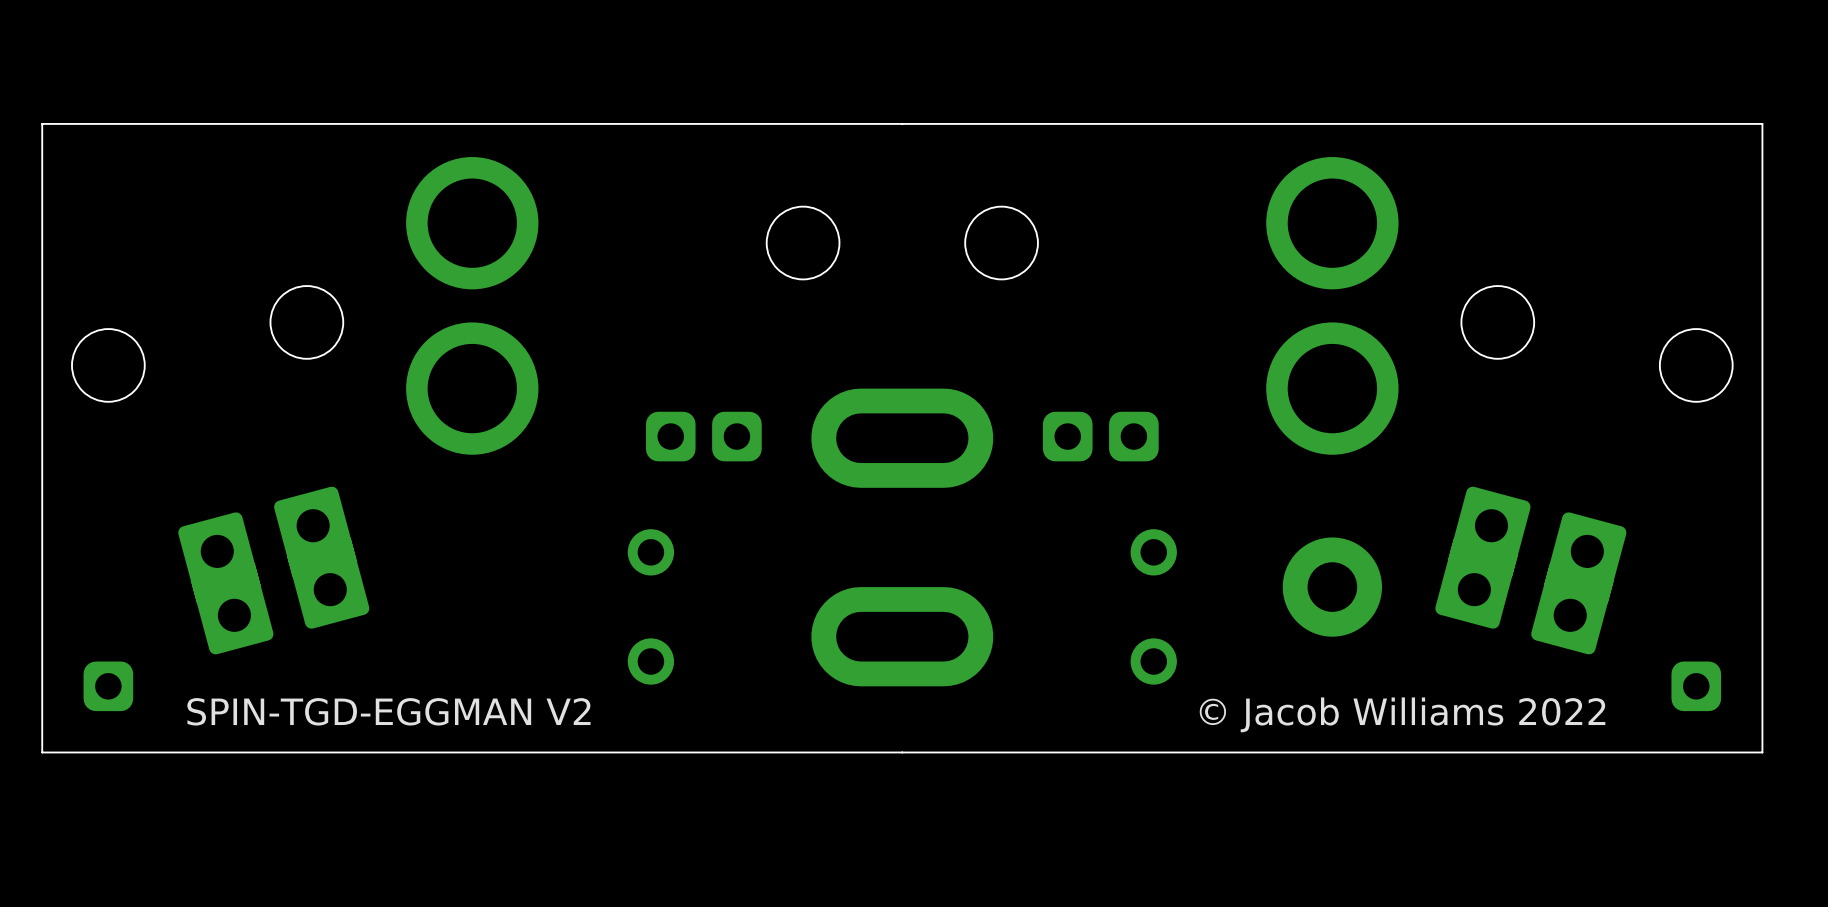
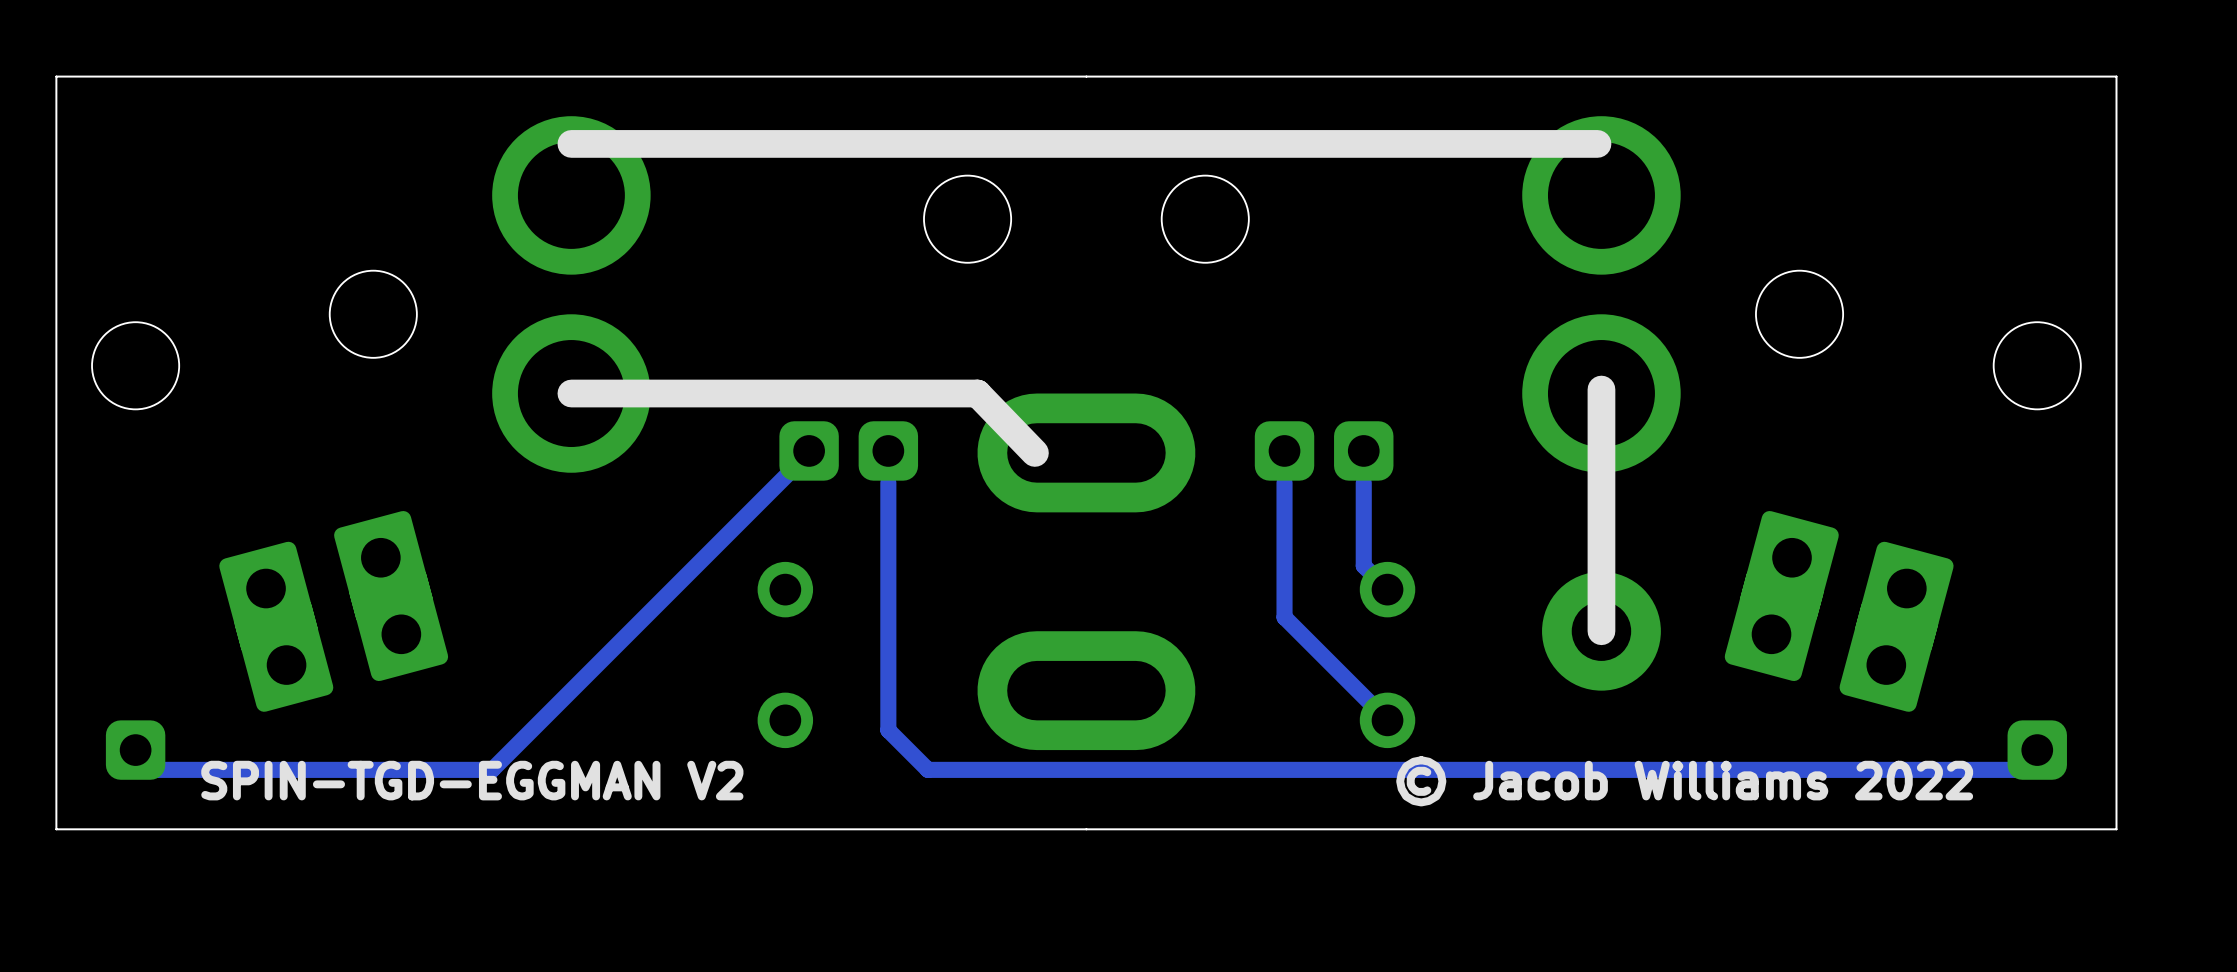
line: none -> (1597, 143) (571, 143)
line: none -> (1601, 389) (1601, 631)
line: none -> (571, 393) (977, 393) (1034, 452)
track: none -> (809, 450) (492, 769) (155, 769) (135, 750)
track: none -> (888, 482) (888, 730) (927, 769) (2017, 769) (2037, 750)
track: none -> (1284, 482) (1284, 617) (1387, 720)
track: none -> (1363, 482) (1363, 565) (1387, 589)

